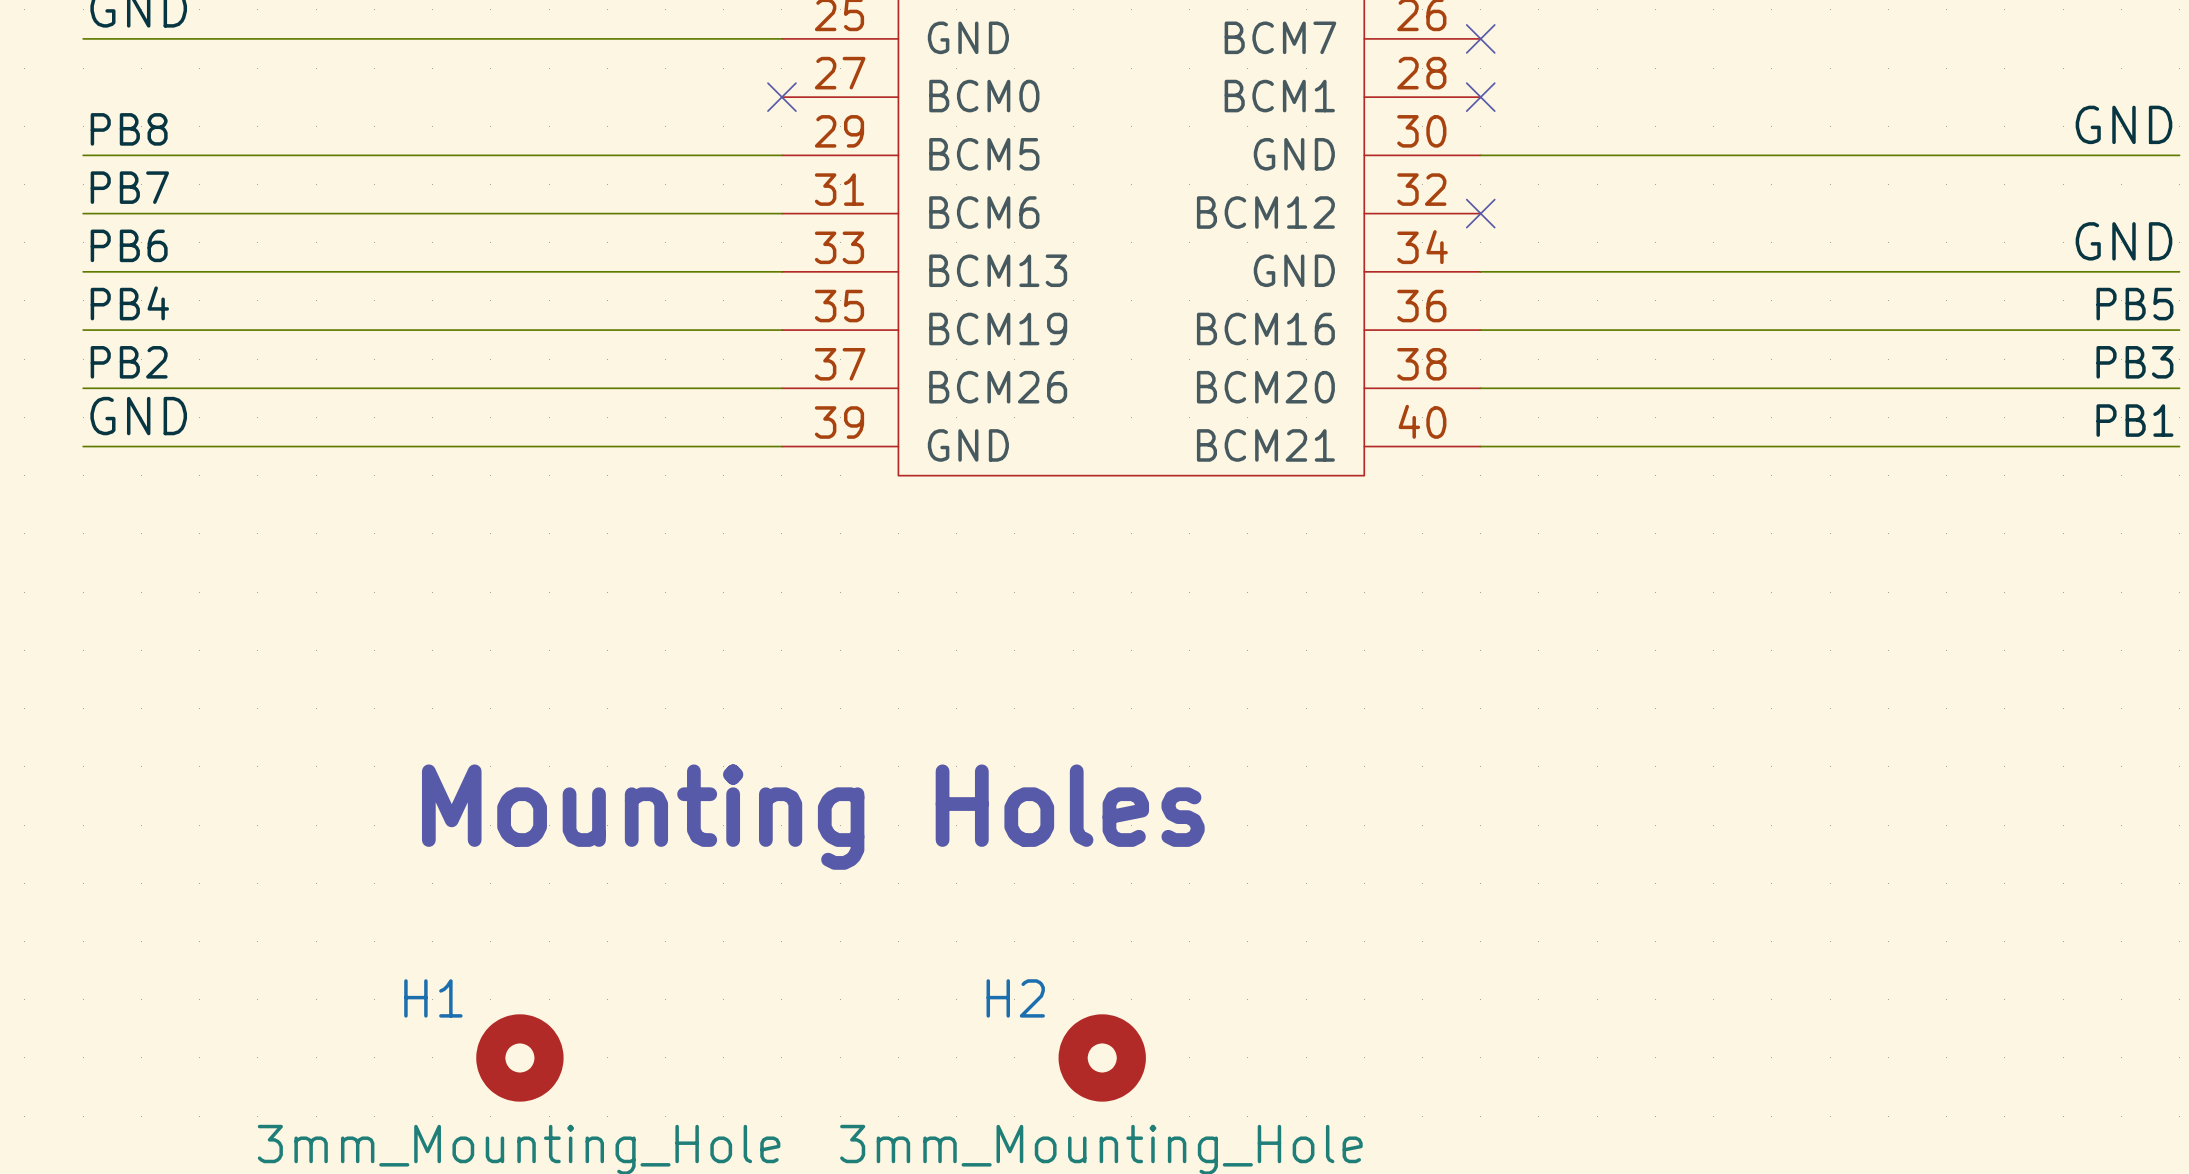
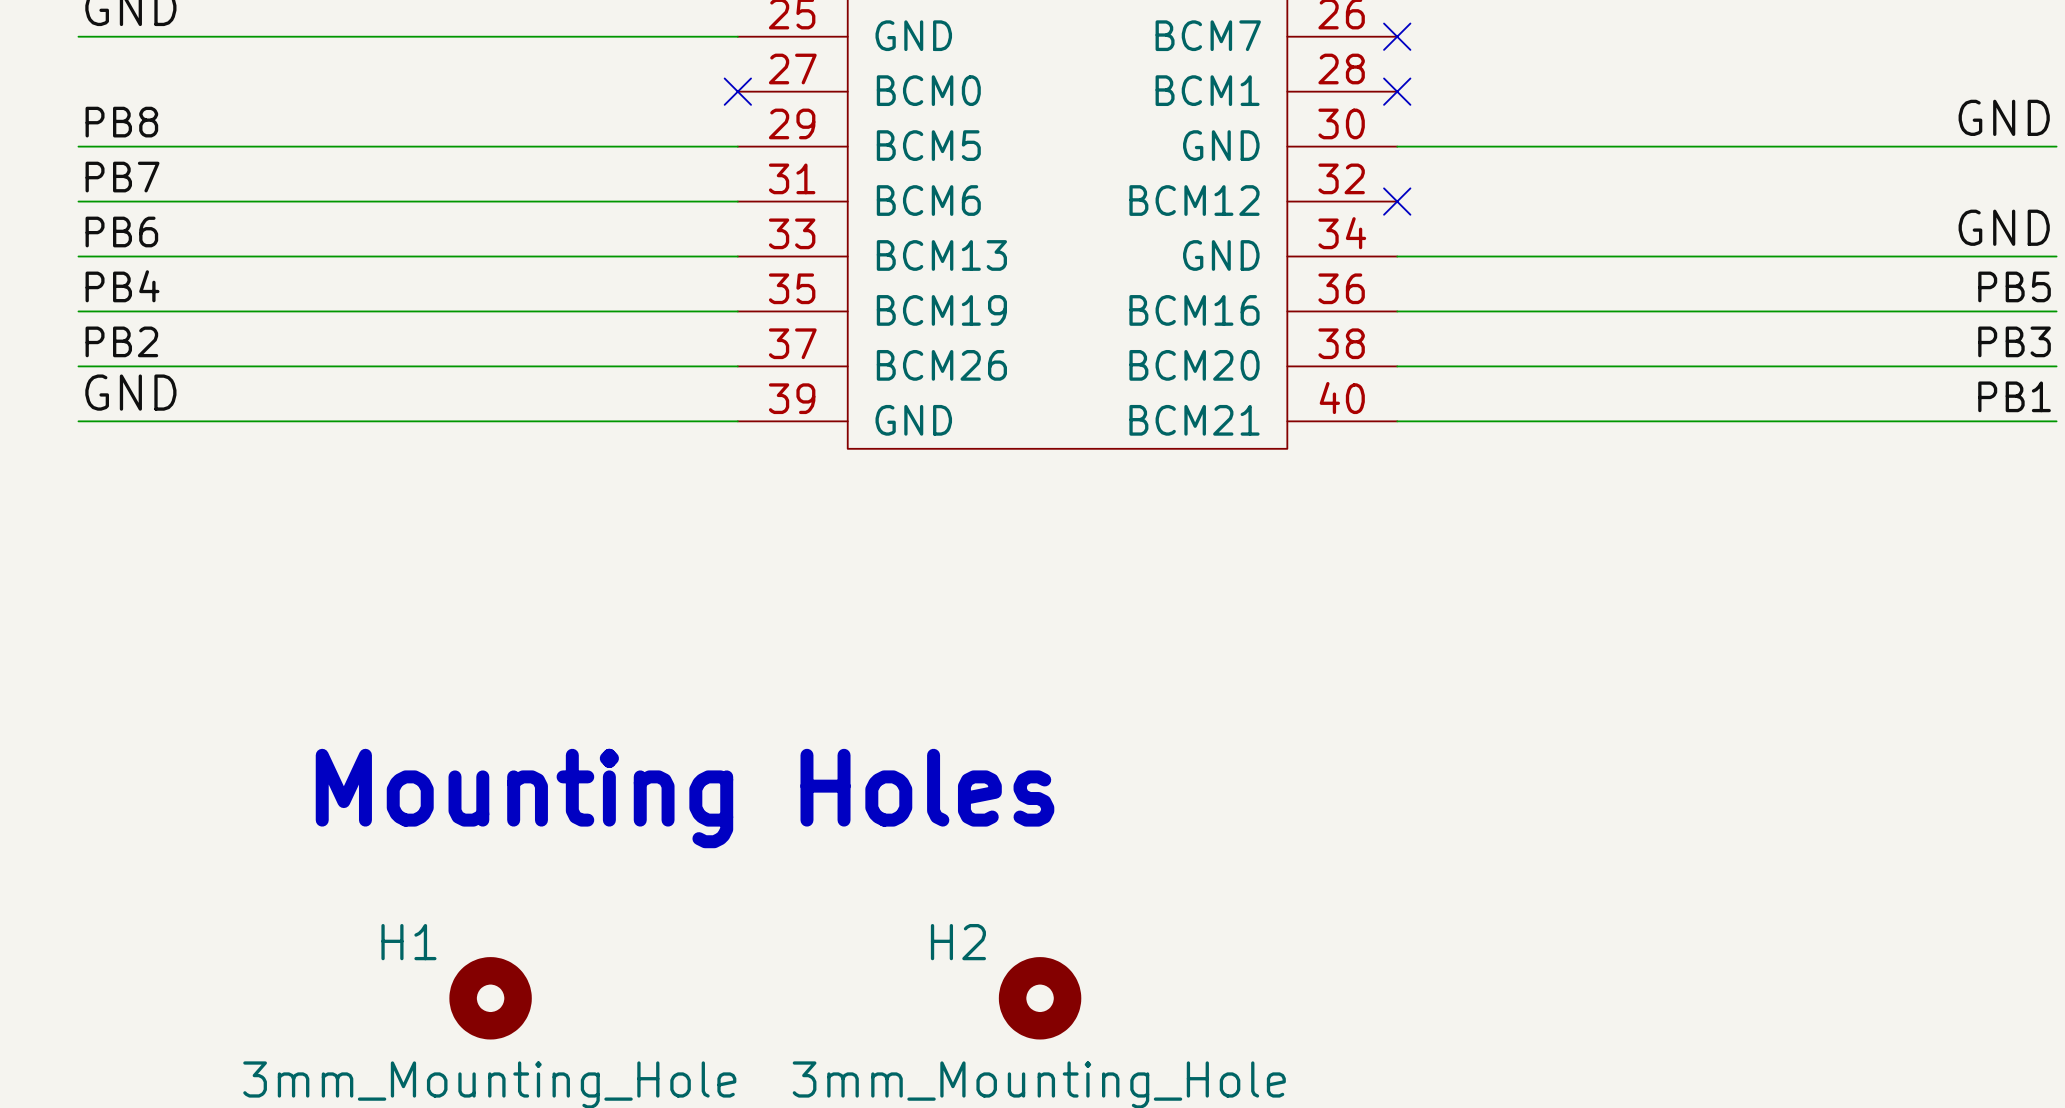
text position: Mounting Holes (813, 817) -> Mounting Holes (685, 798)

